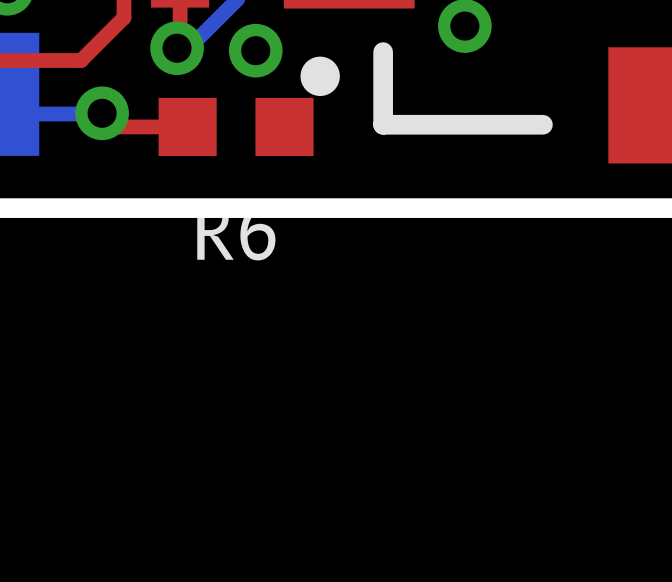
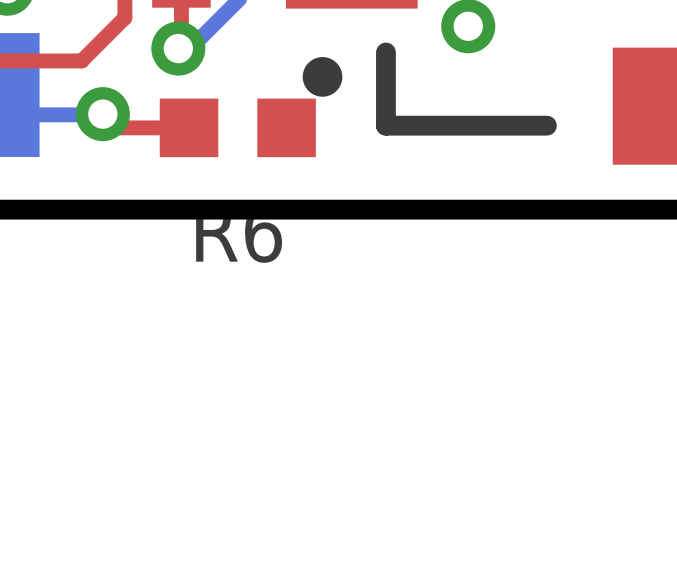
via: (255, 50) -> none

